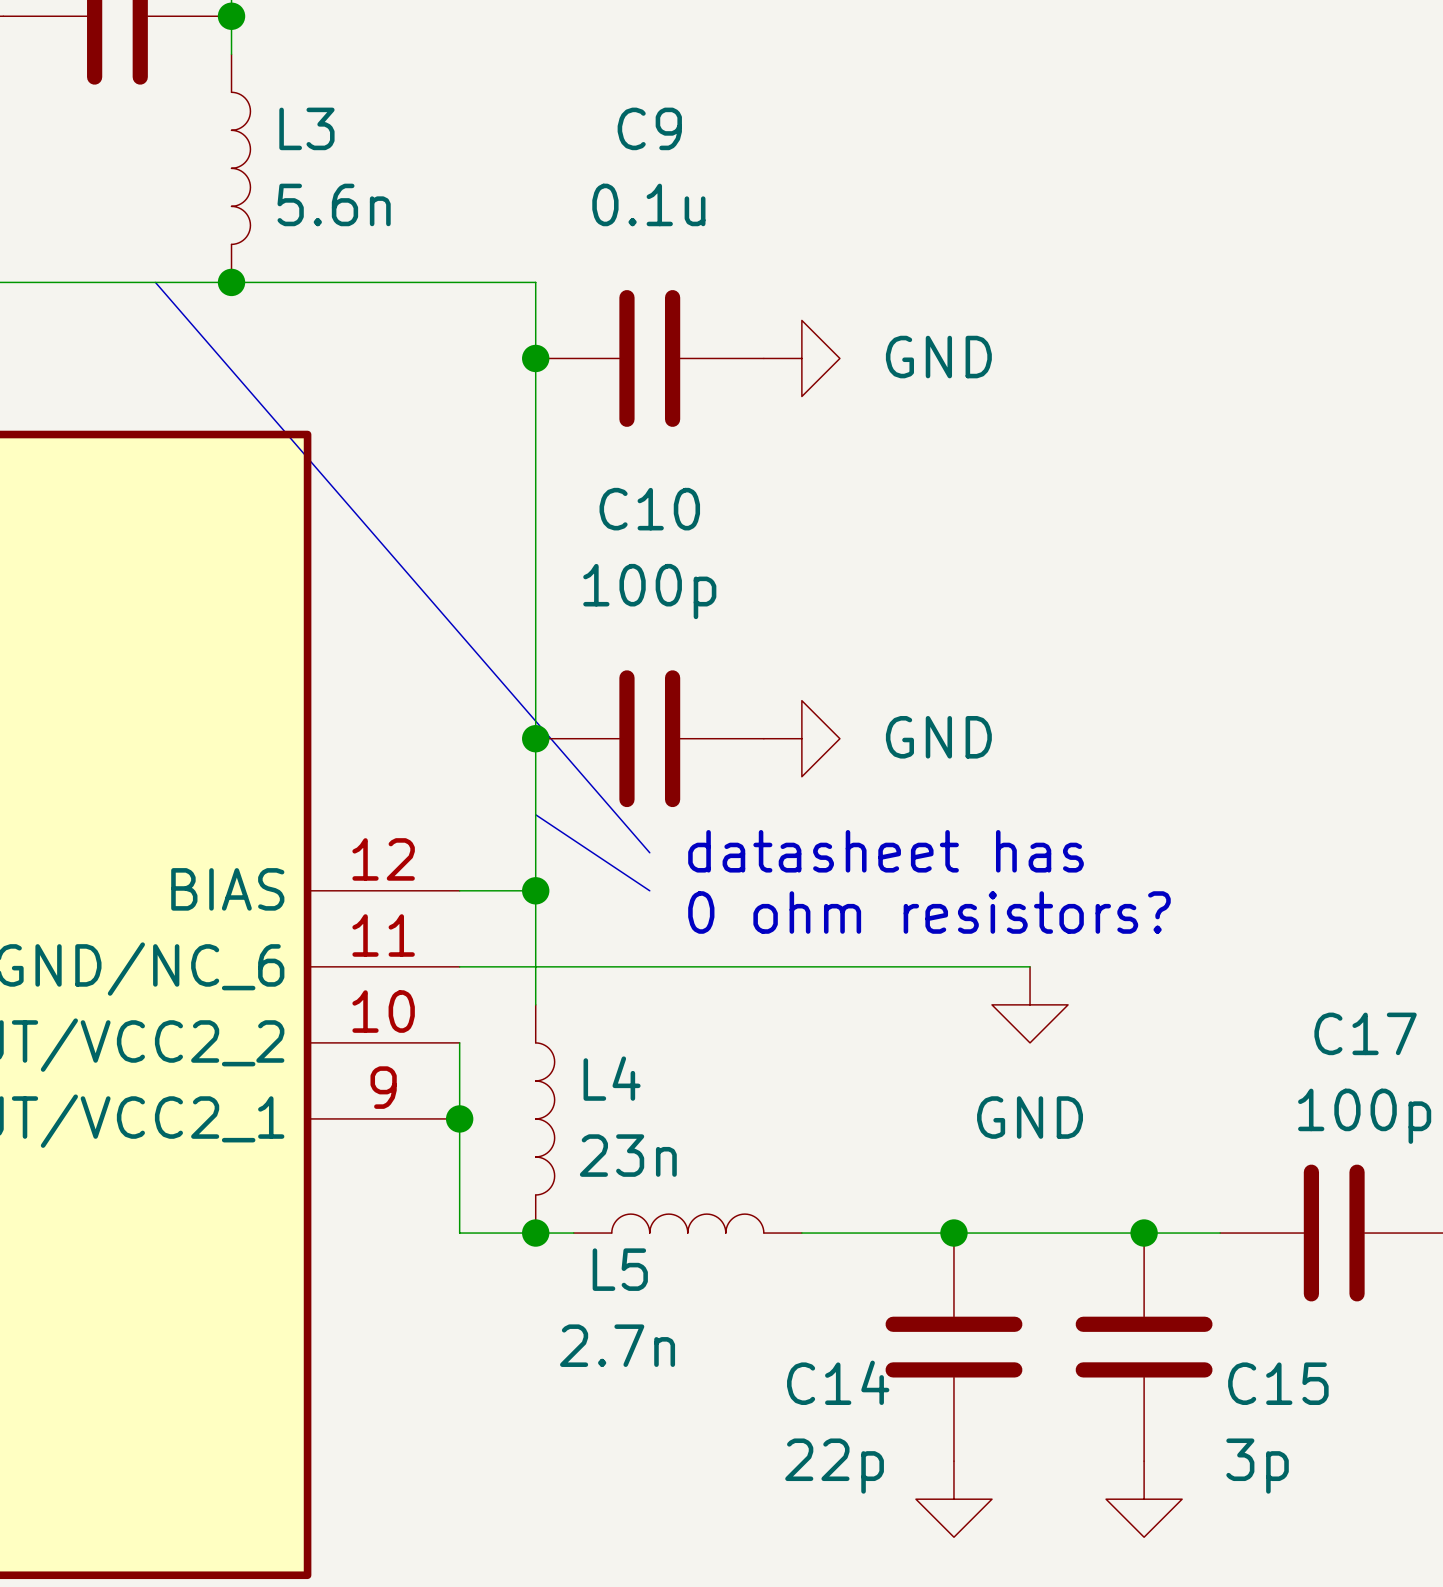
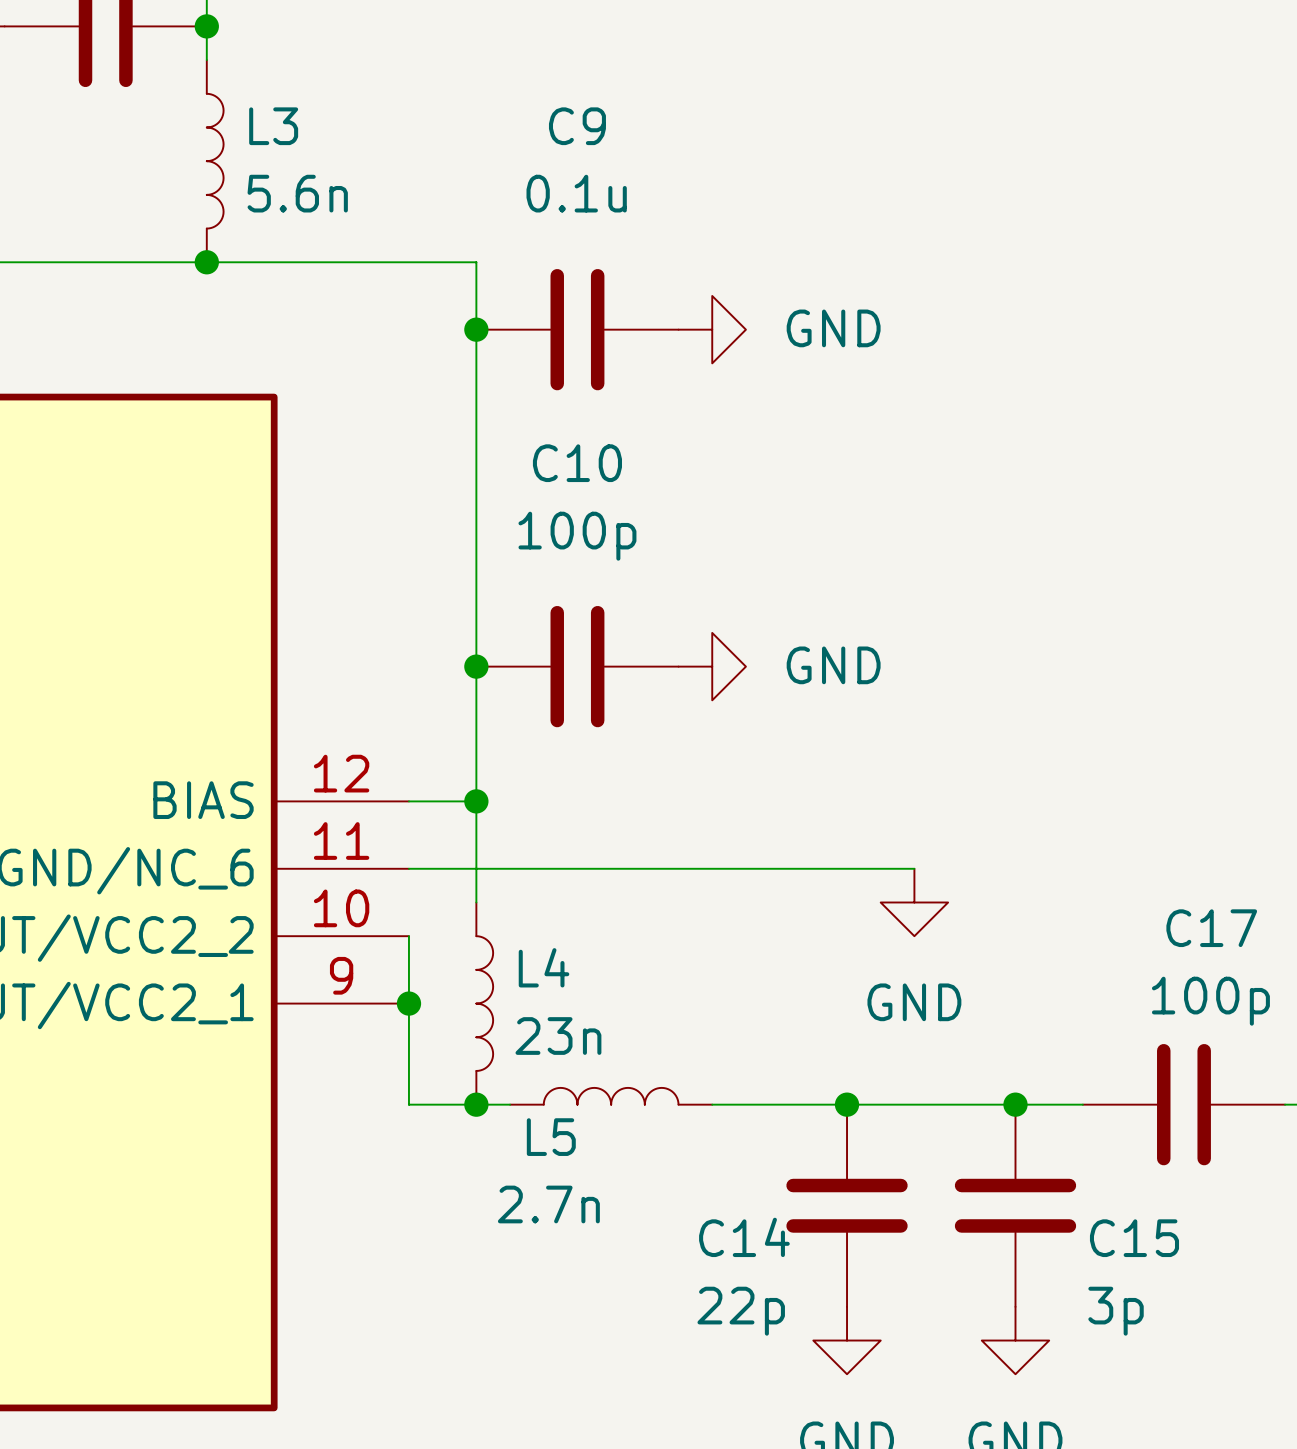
line: (155, 282) (649, 852) -> none
line: (535, 814) (649, 890) -> none
text: datasheet has (886, 851) -> none
text: 0 ohm resistors? (929, 912) -> none

